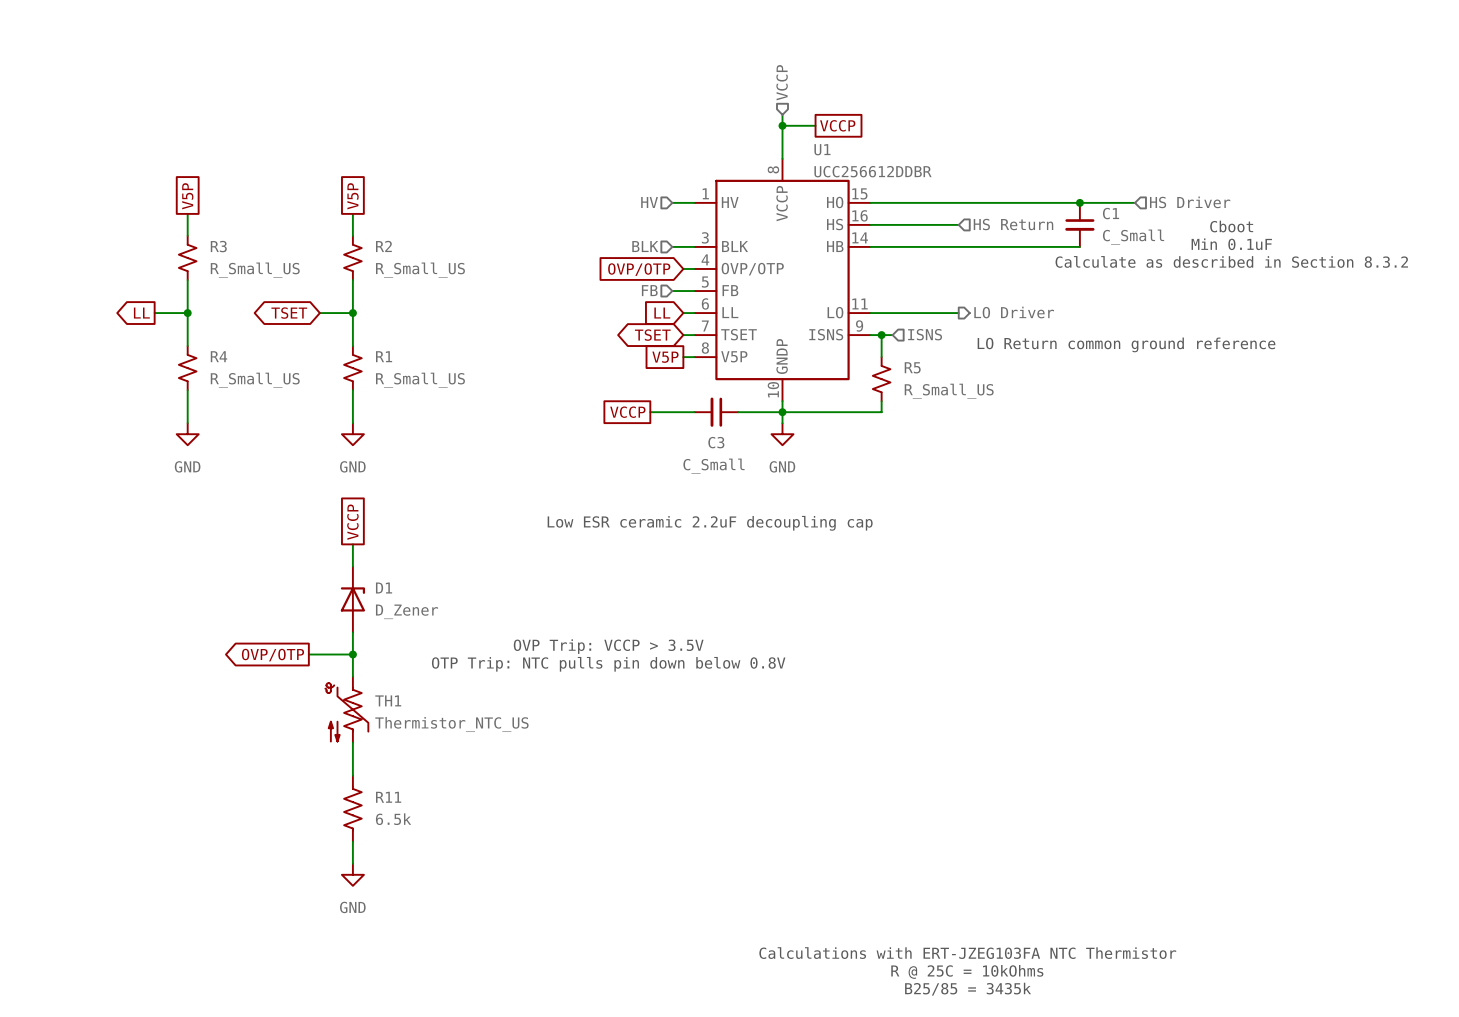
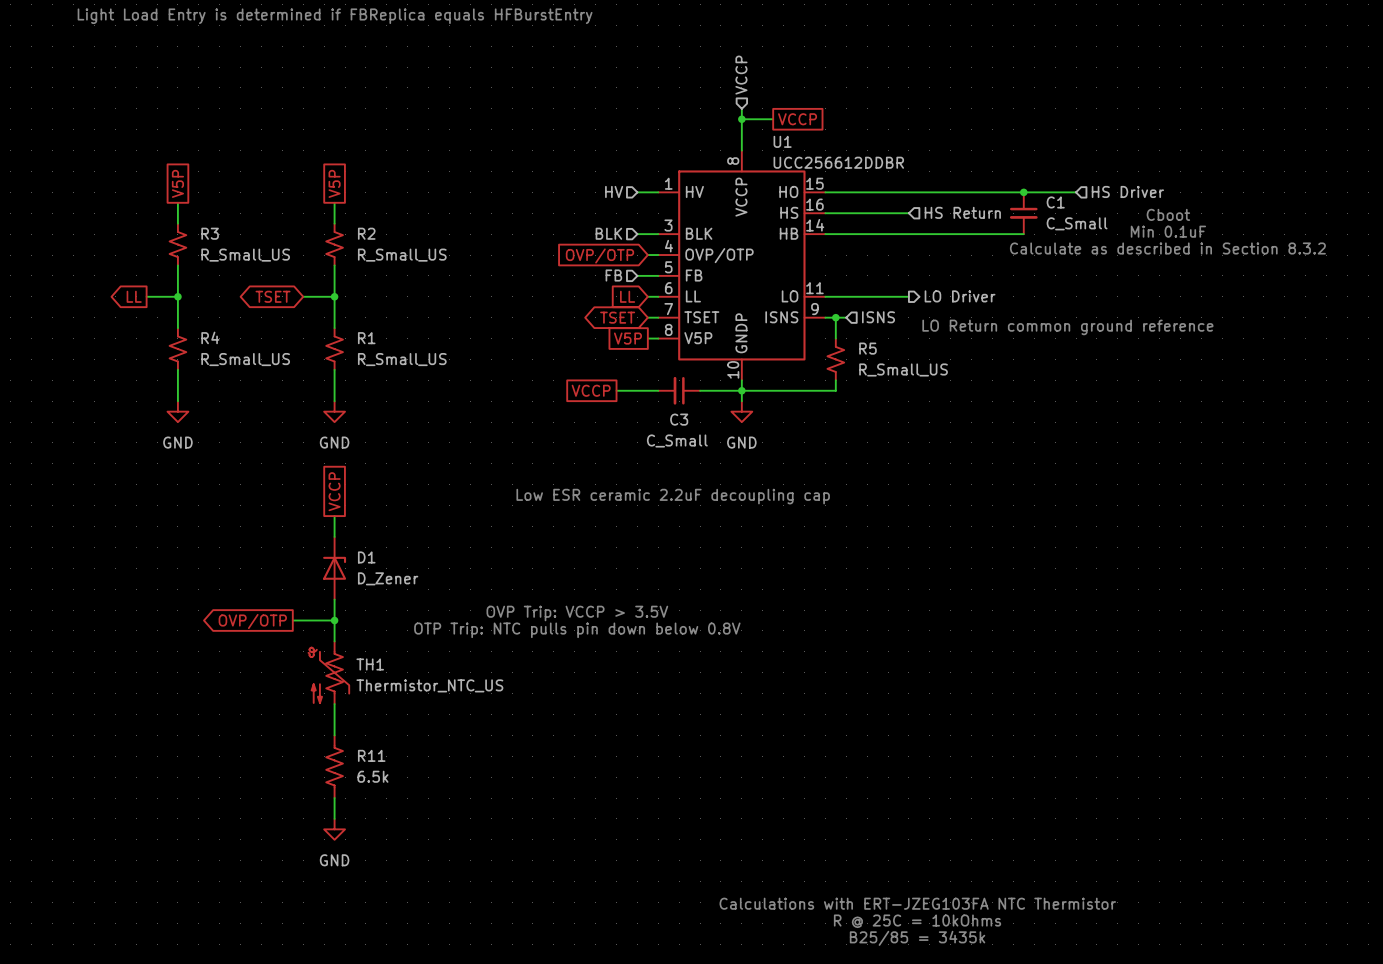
text: none -> Light Load Entry is determined if FBReplica equals HFBurstEntry (335, 16)

